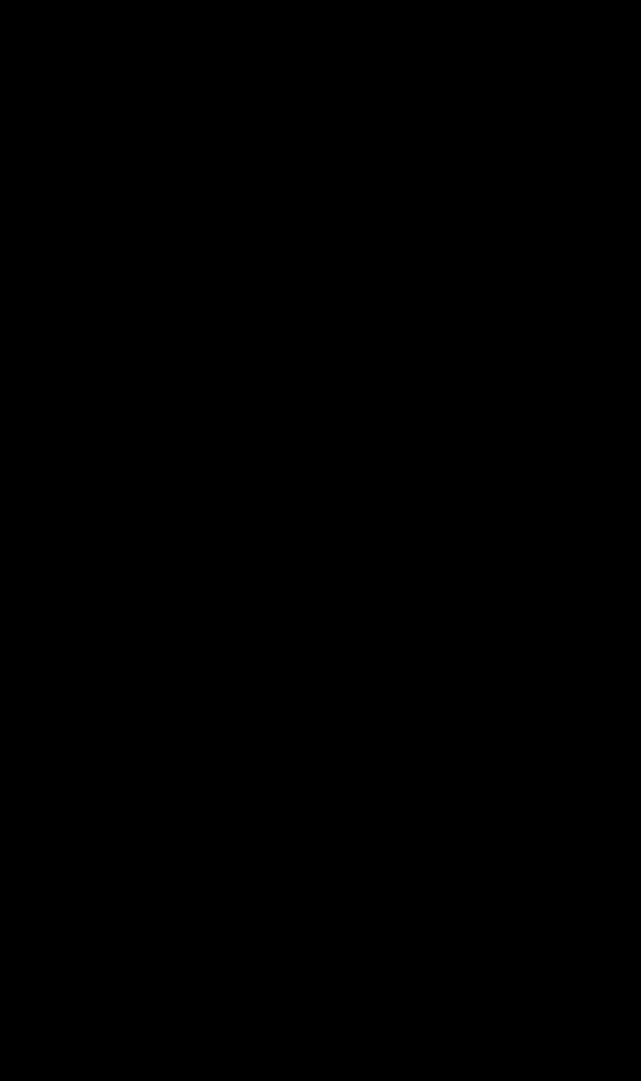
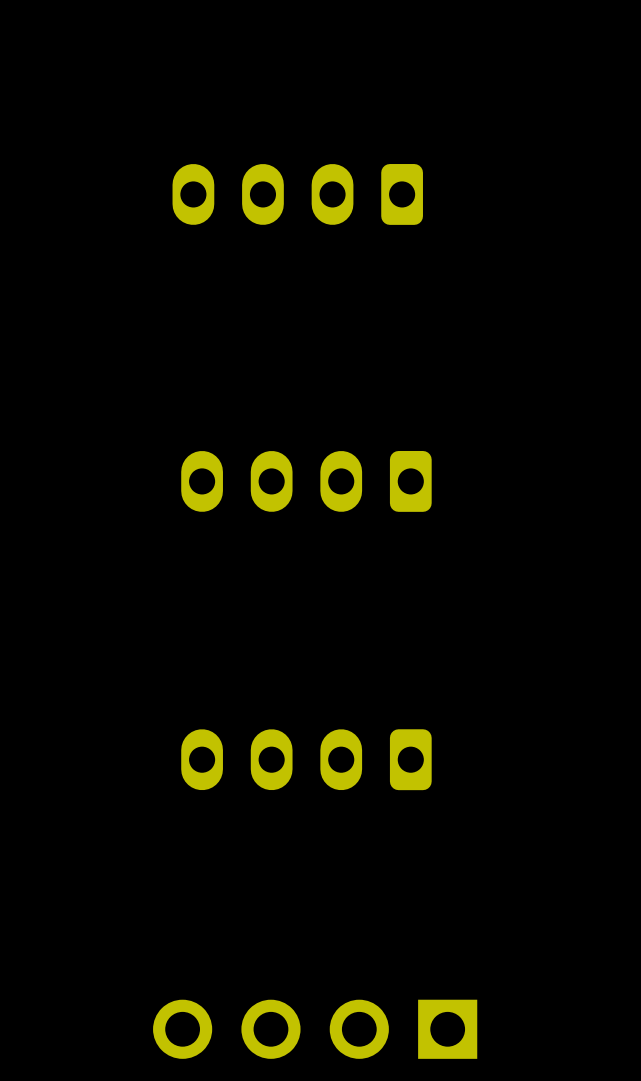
part: none -> (297, 194)
part: none -> (306, 481)
part: none -> (306, 759)
part: none -> (315, 1029)

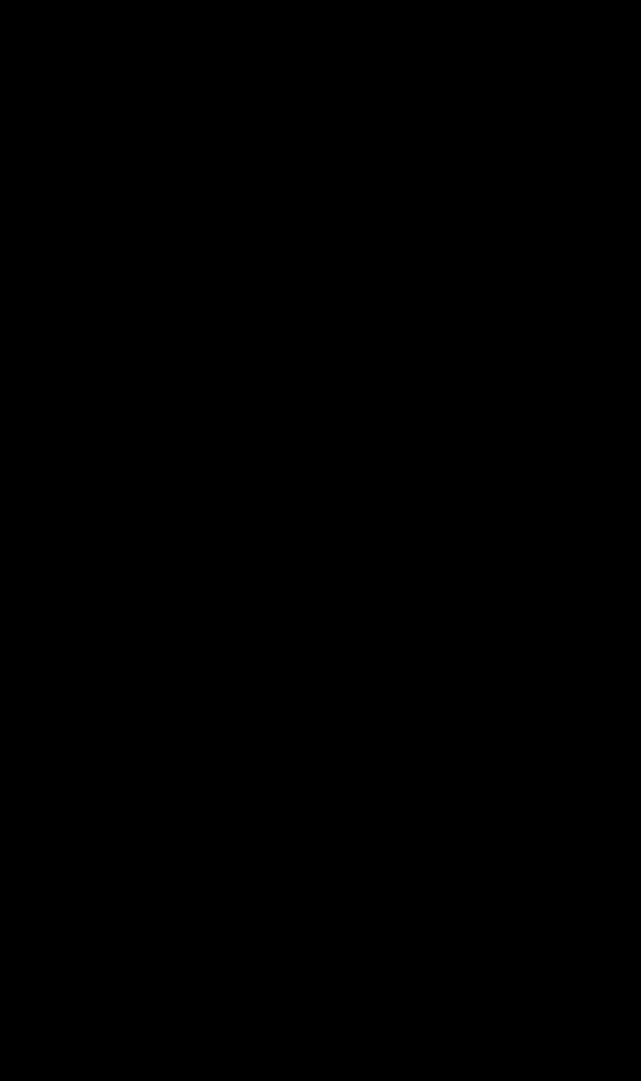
part: (297, 194) -> none
part: (306, 481) -> none
part: (306, 759) -> none
part: (315, 1029) -> none

